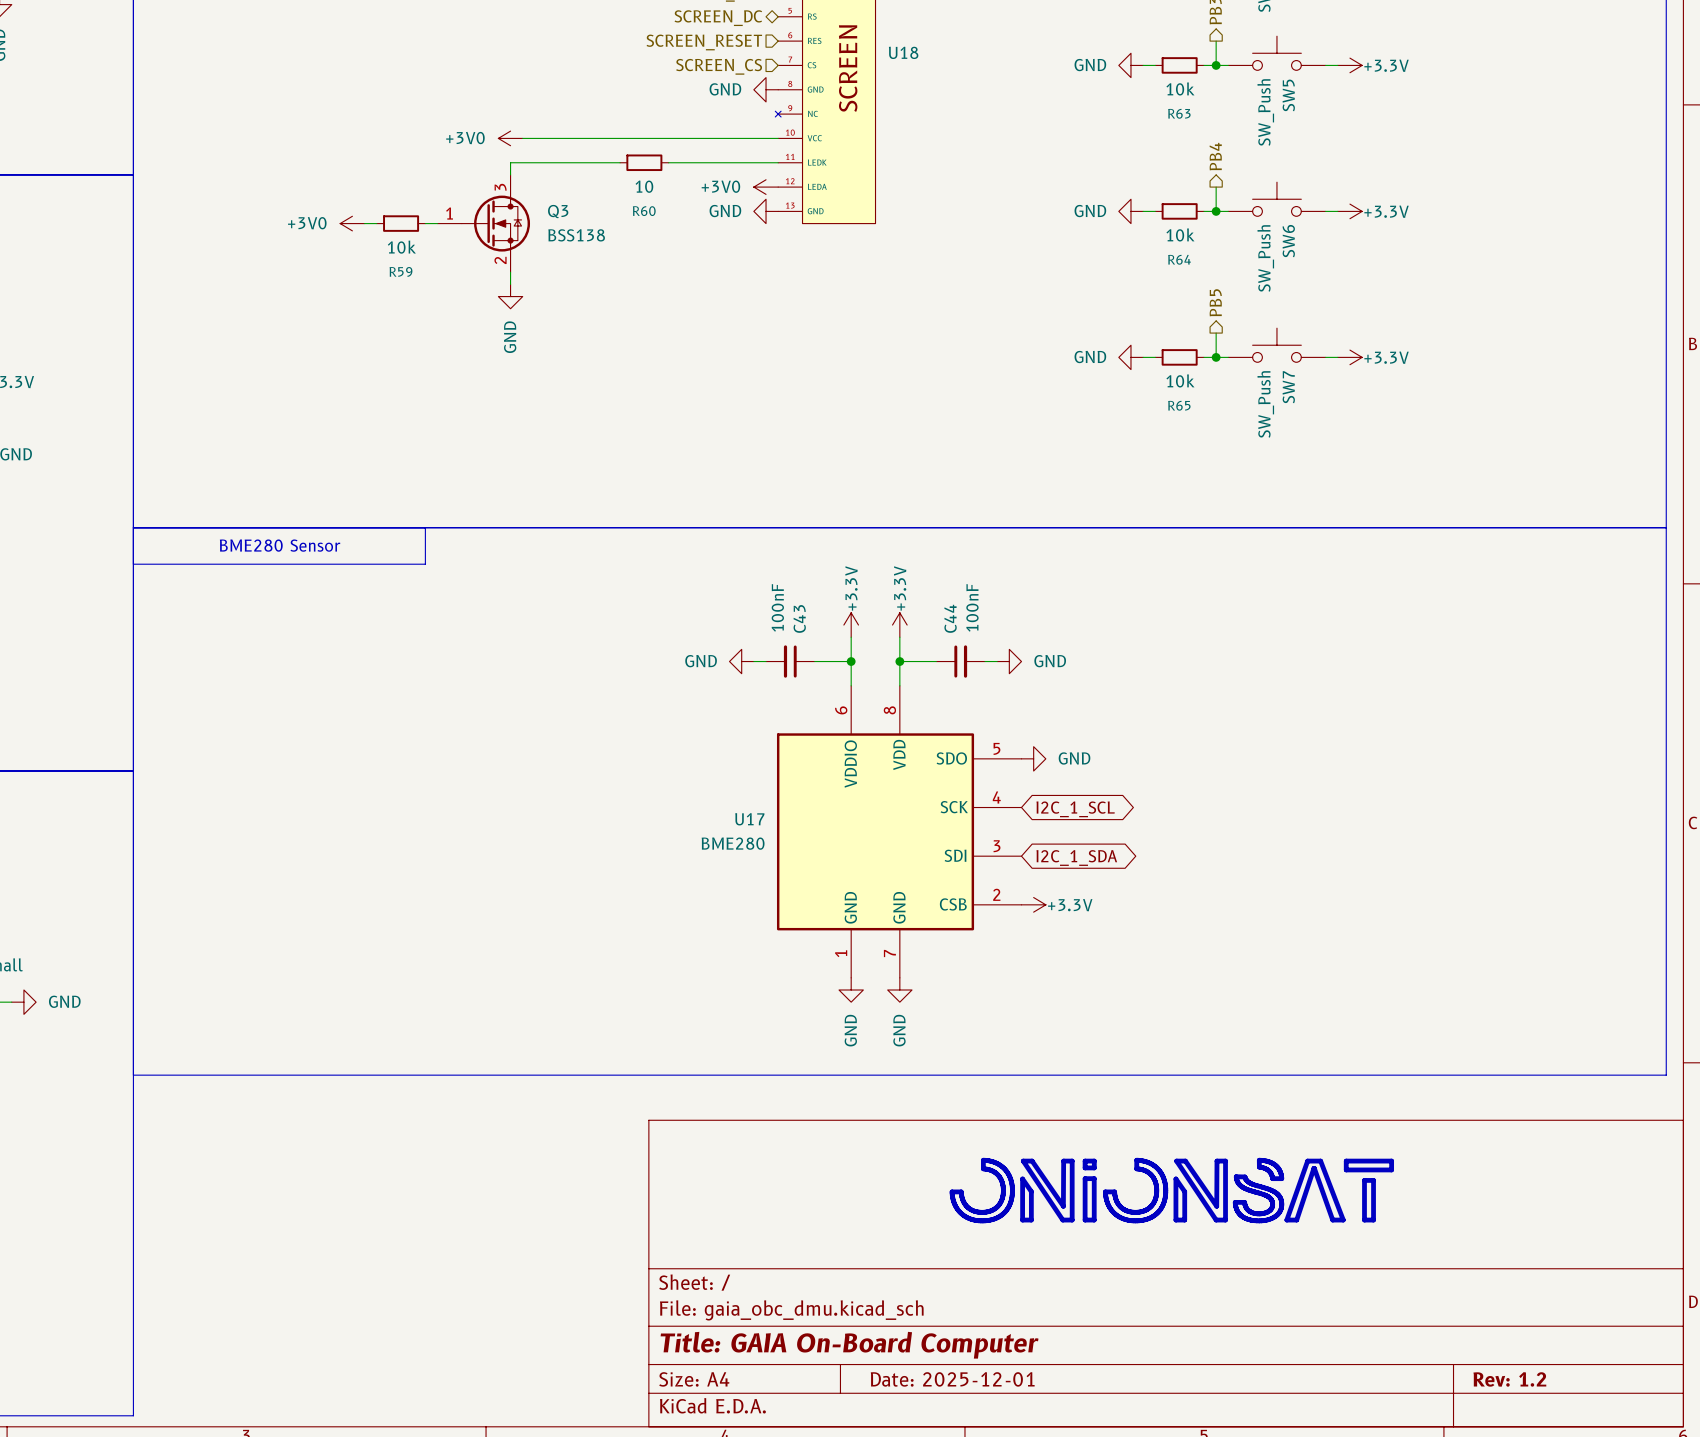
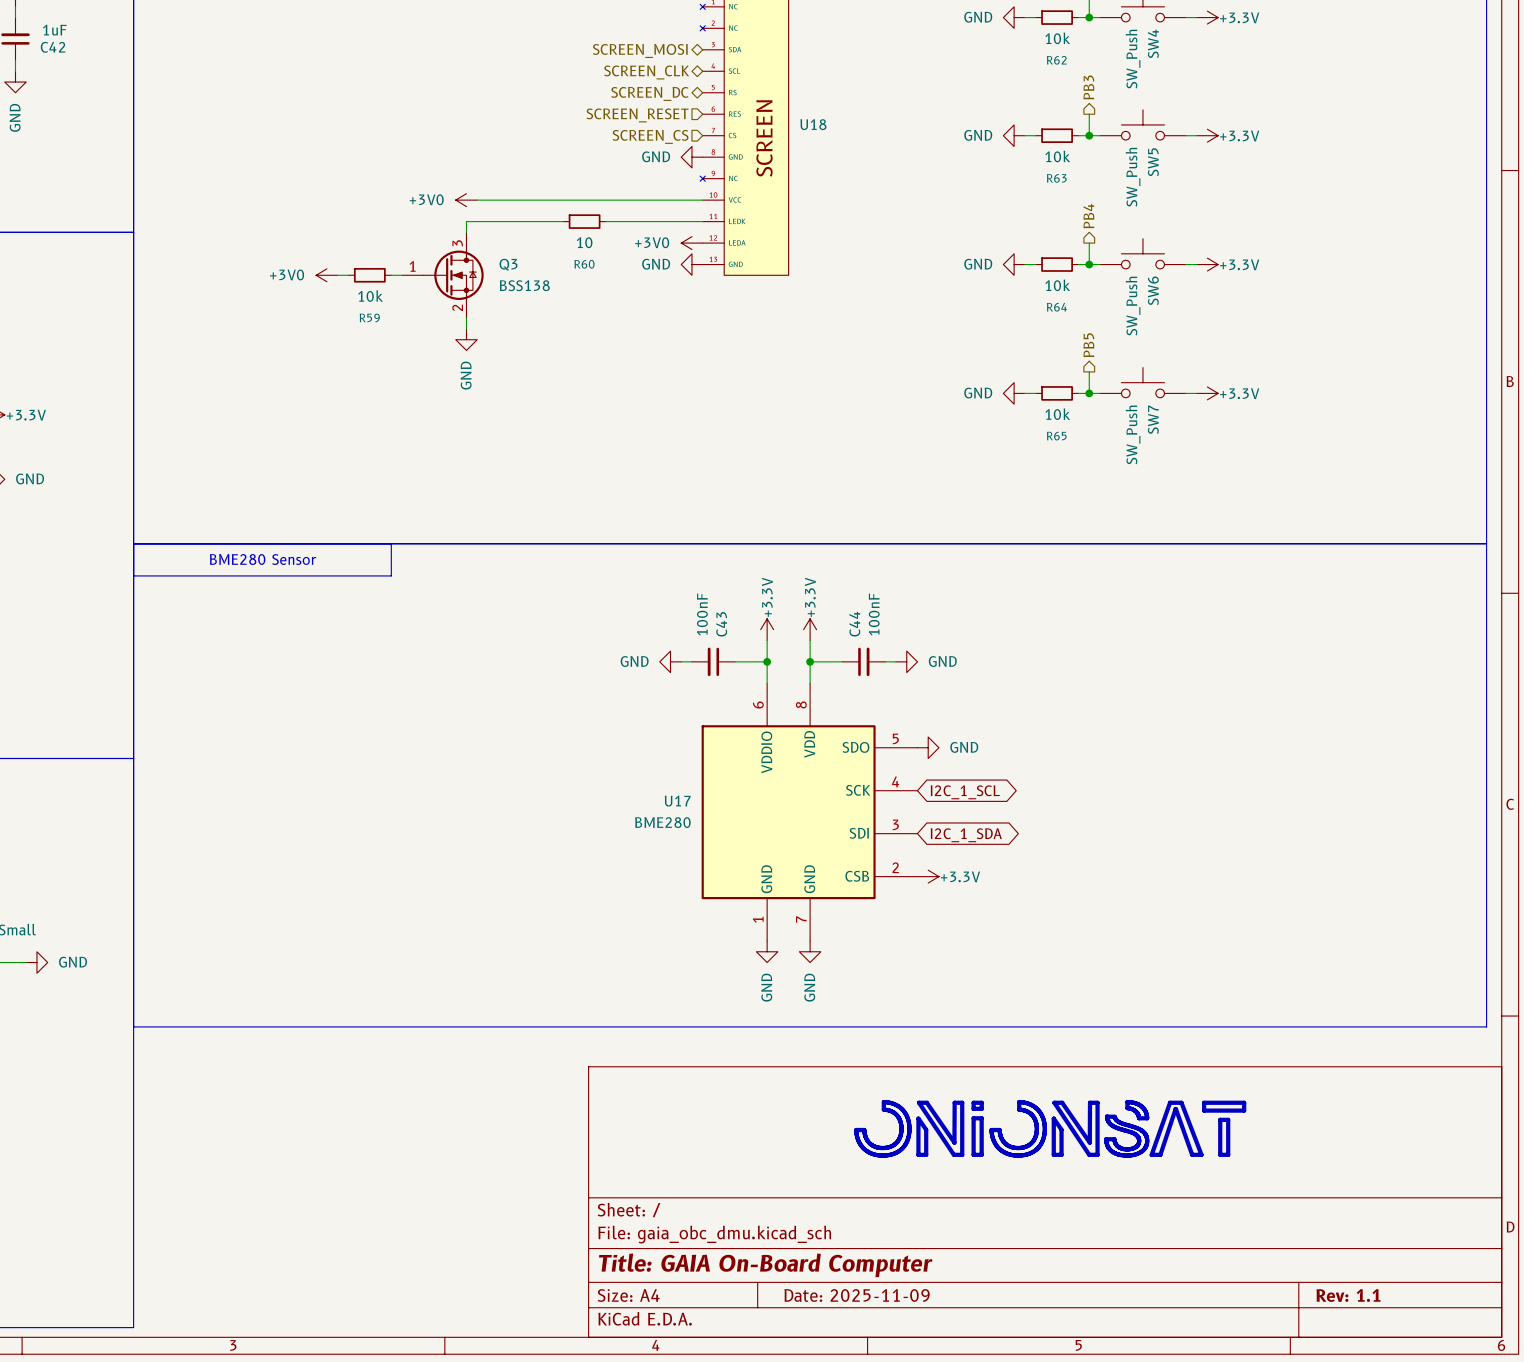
title block: Date: 2025-12-01 (952, 1379) -> Date: 2025-11-09 (857, 1295)
title block: Rev: 1.2 (1509, 1379) -> Rev: 1.1 (1348, 1295)

